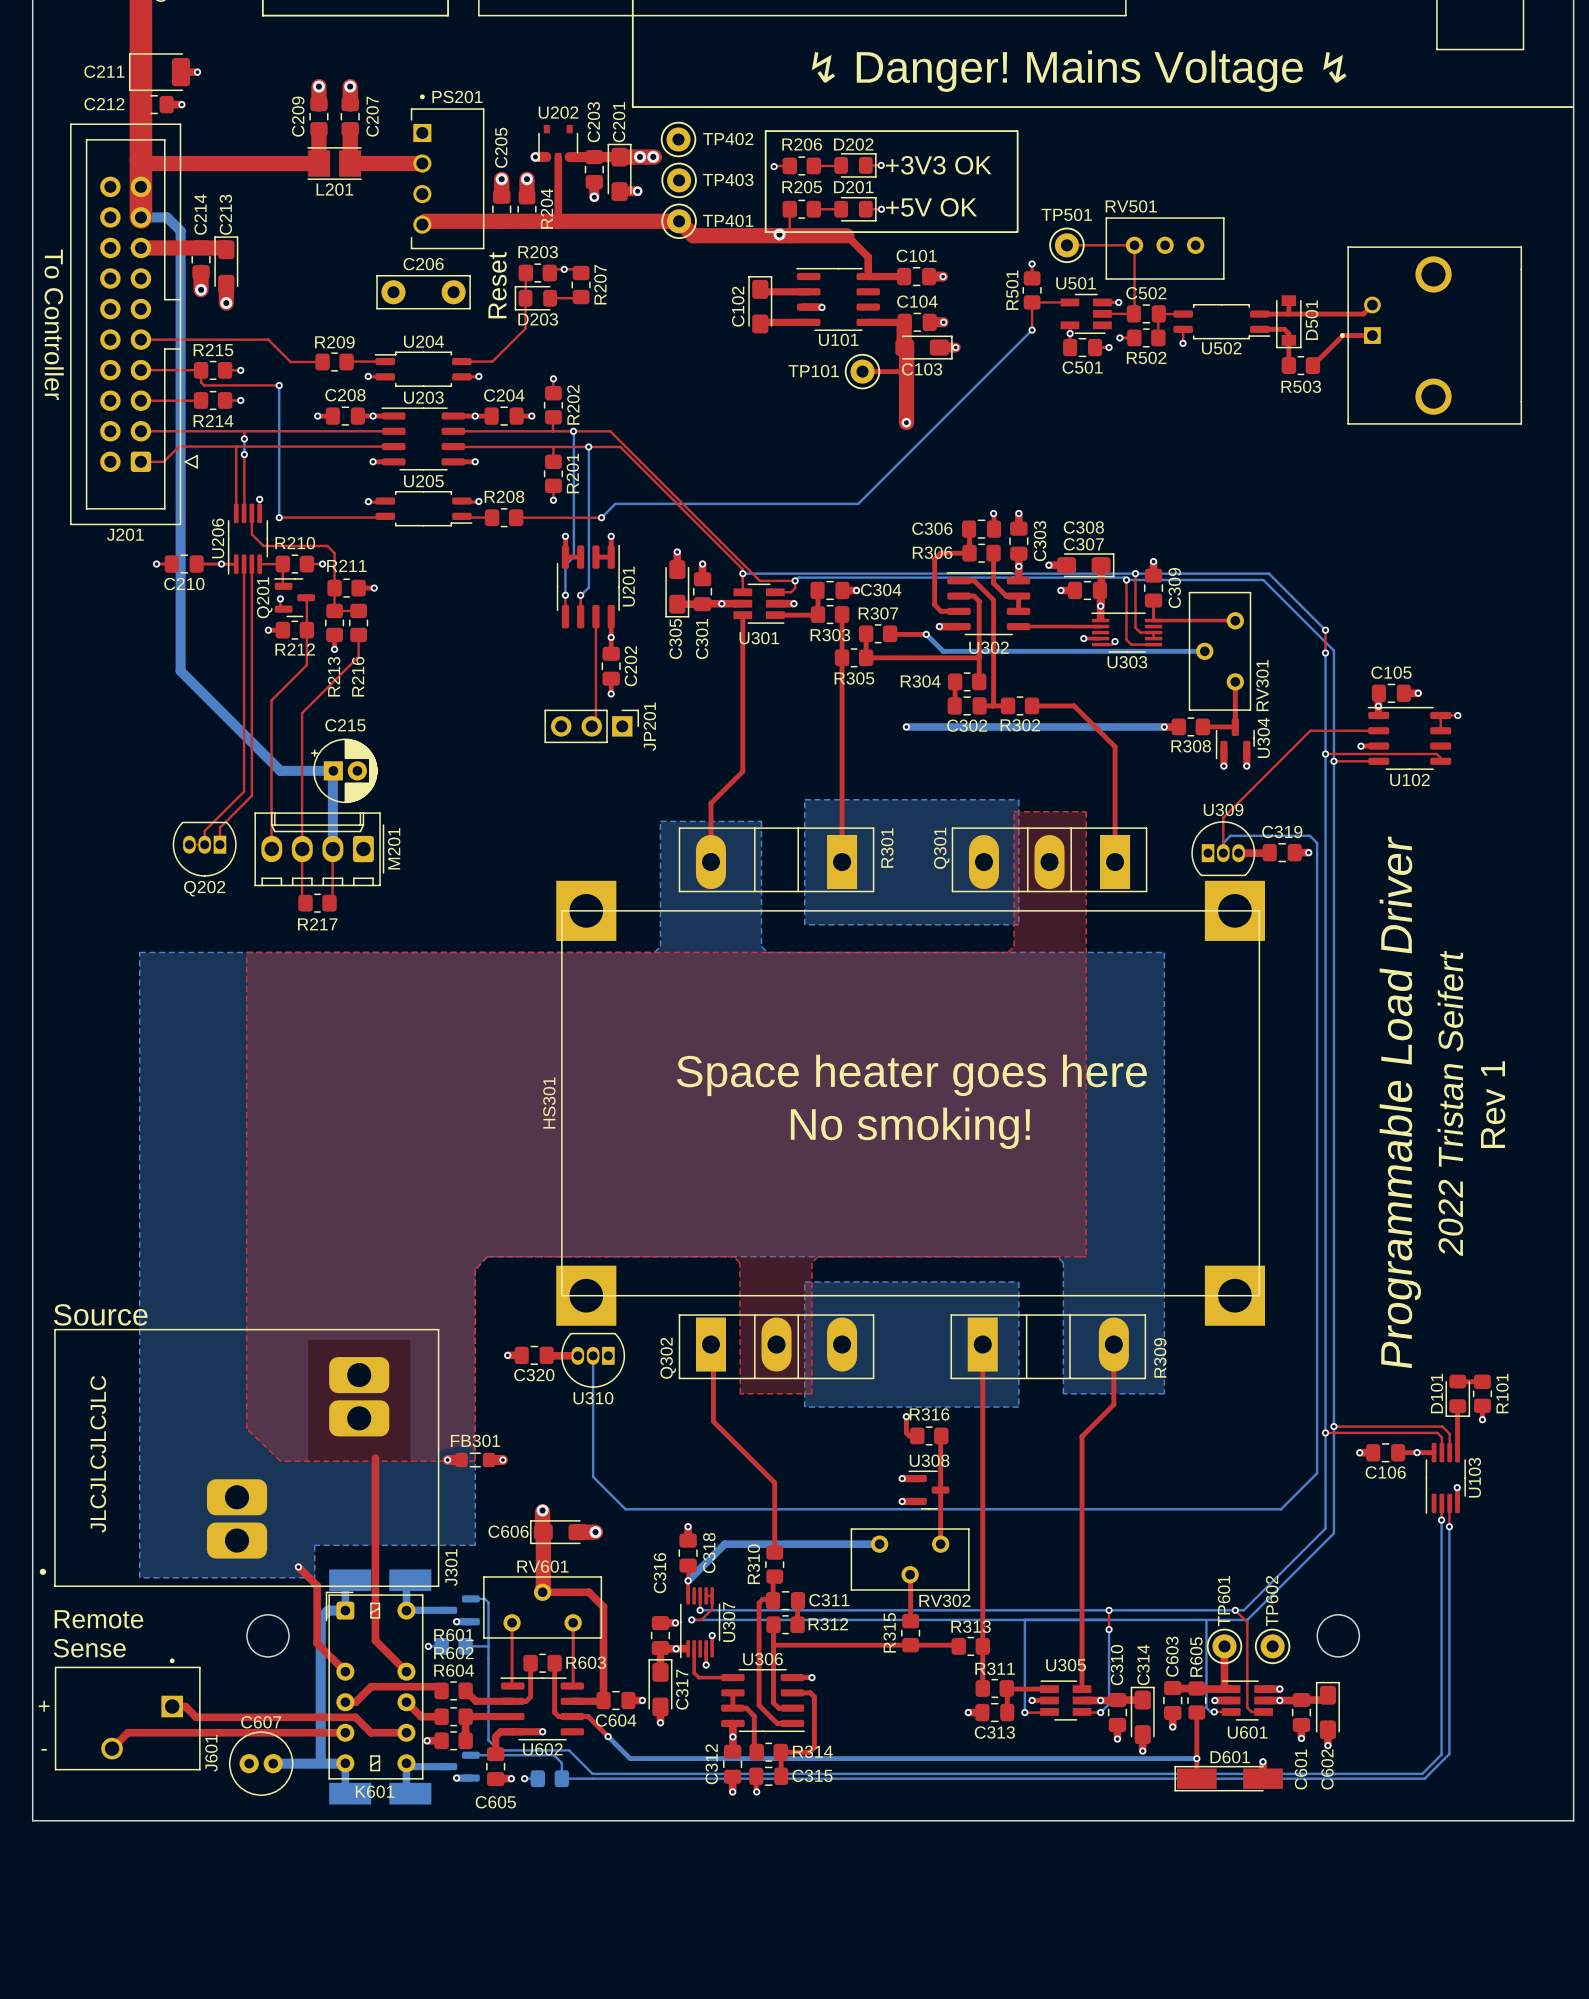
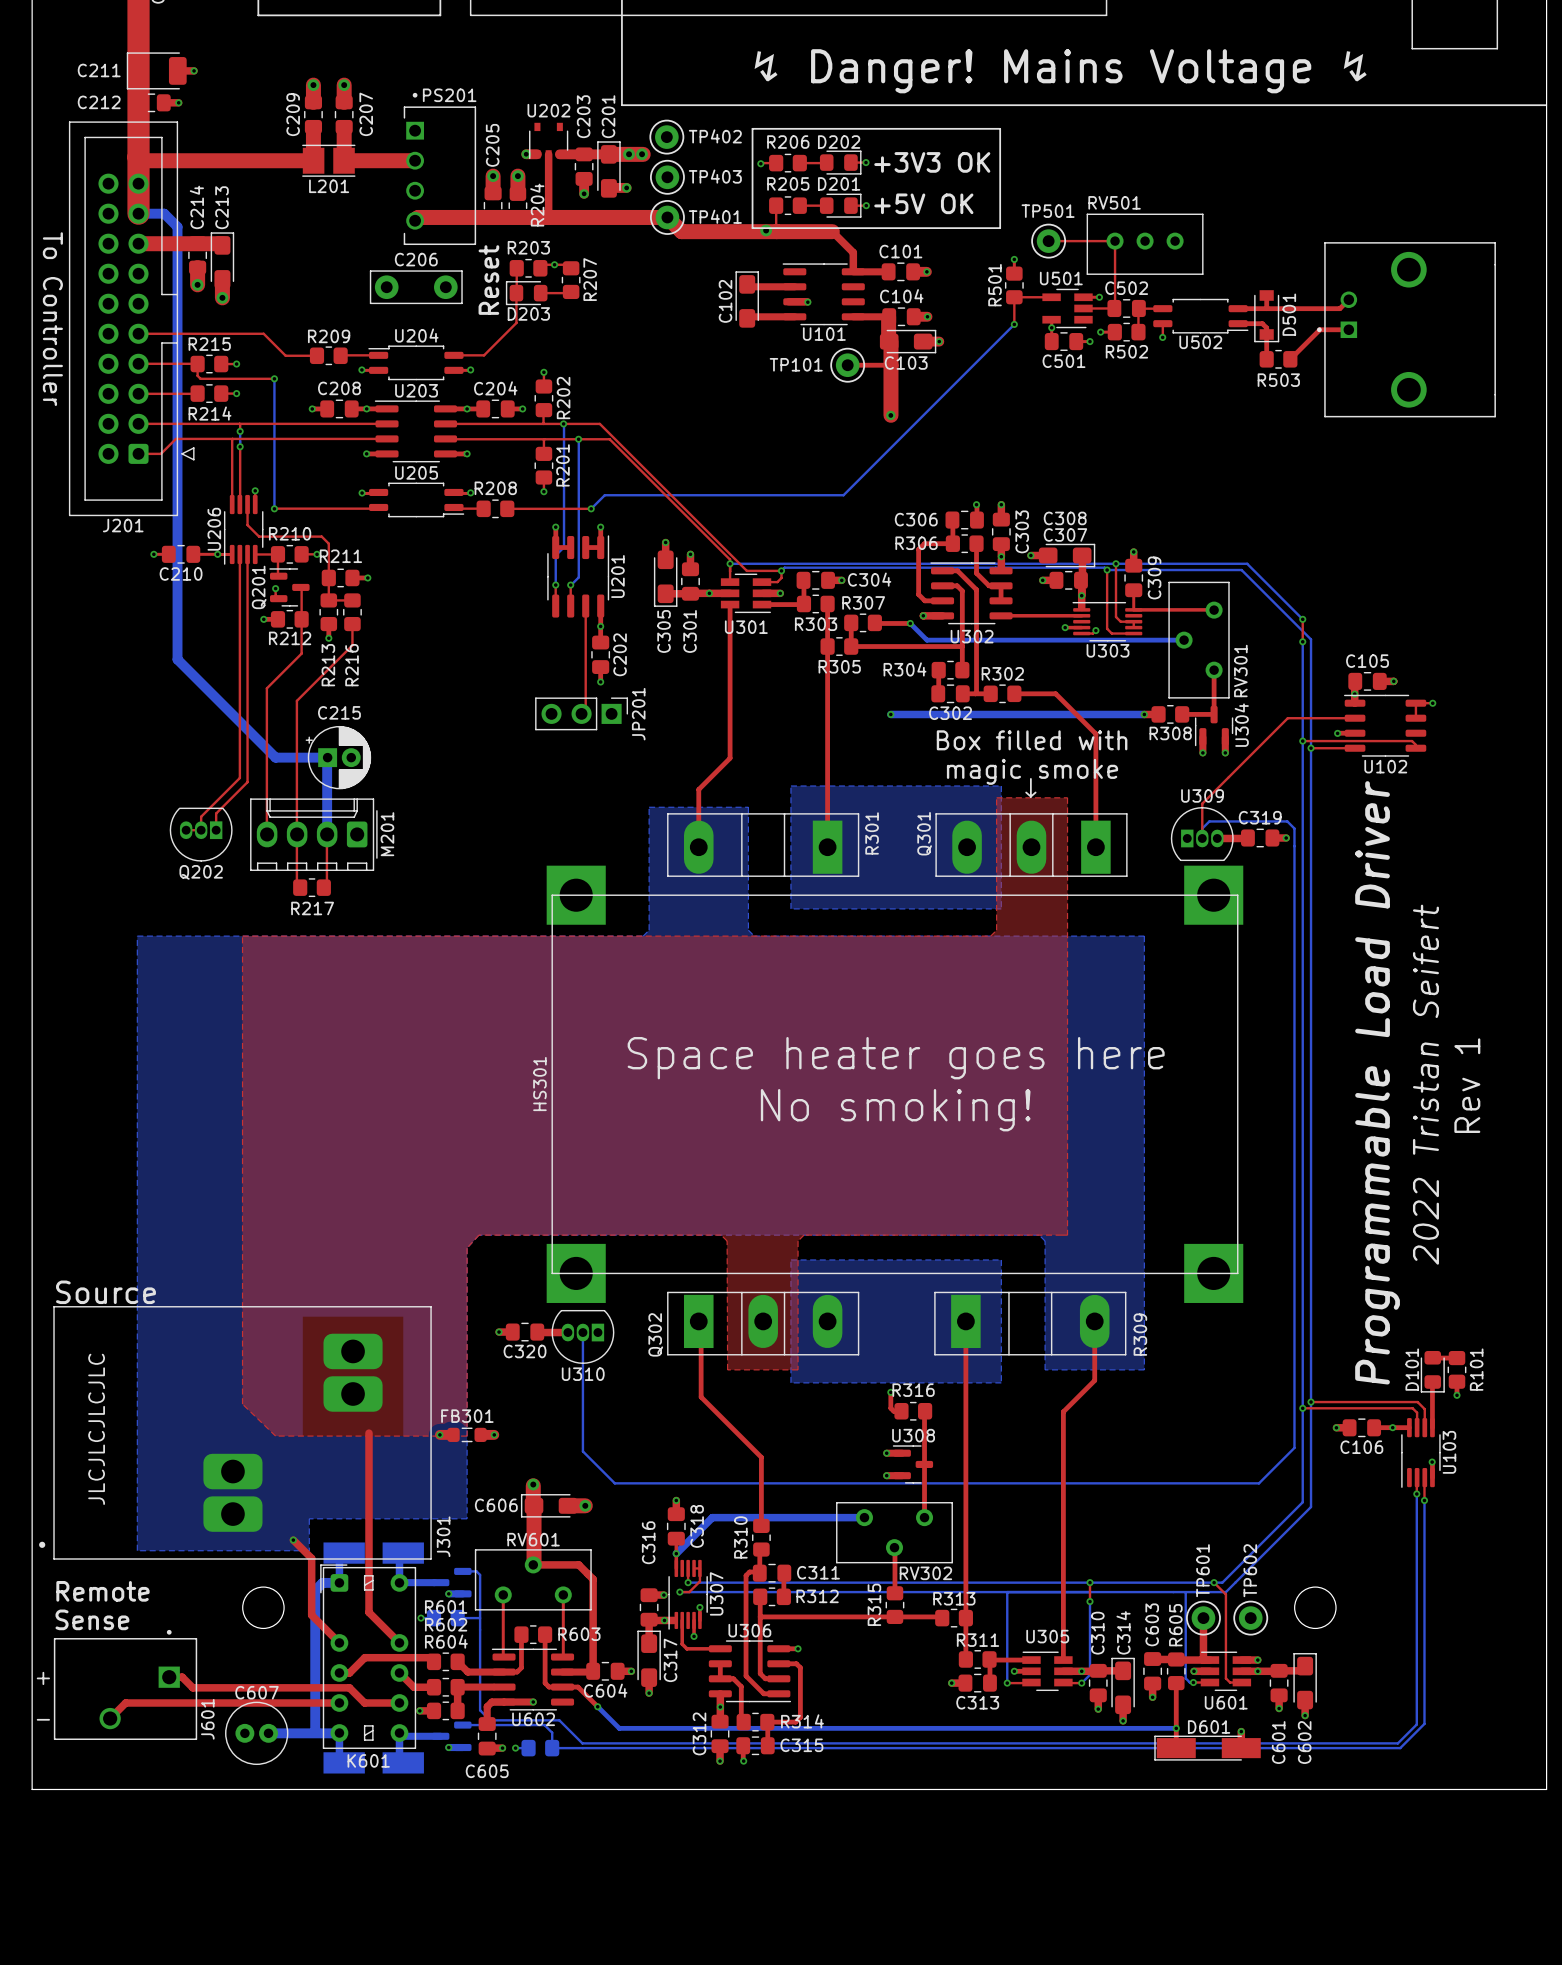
R302 name position: R302 (1020, 725) -> R302 (1002, 673)
text: none -> Box filled with (1032, 740)
text: none -> magic smoke (1032, 771)
line: none -> (1030, 778) (1030, 796)
line: none -> (1026, 792) (1030, 796)
line: none -> (1035, 792) (1030, 796)

